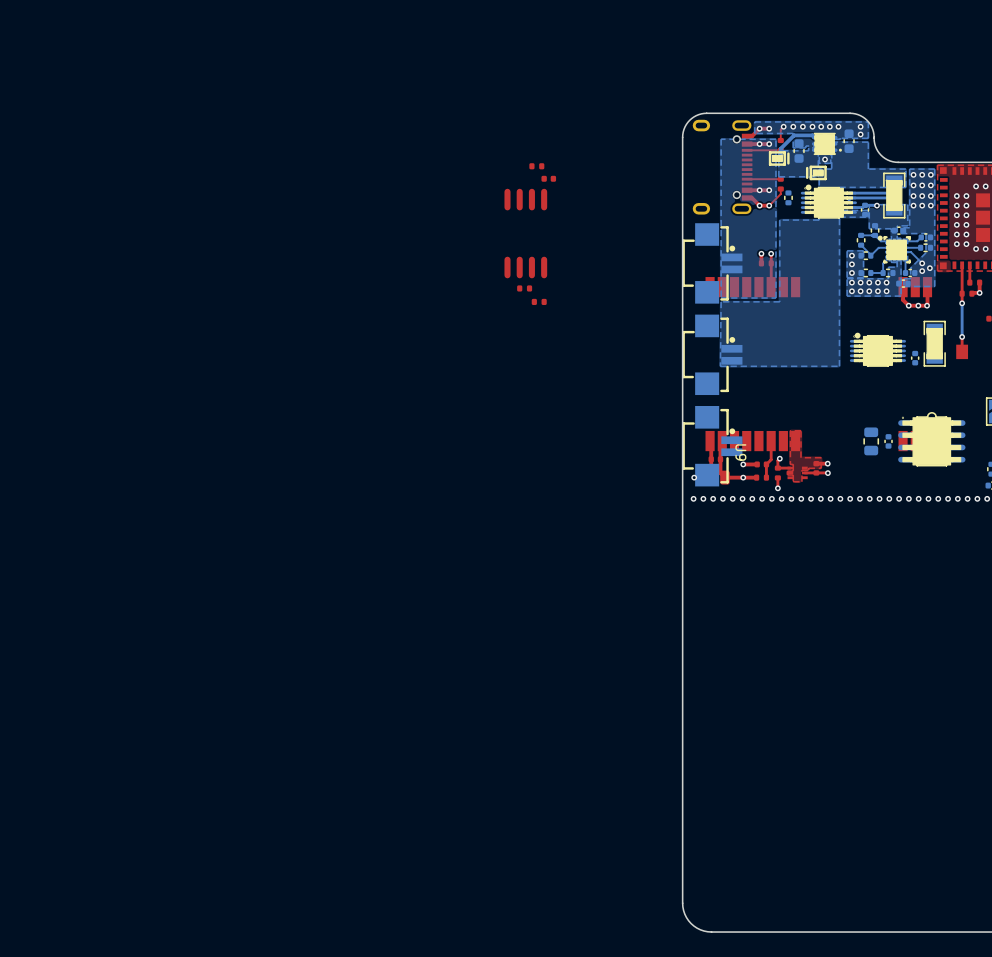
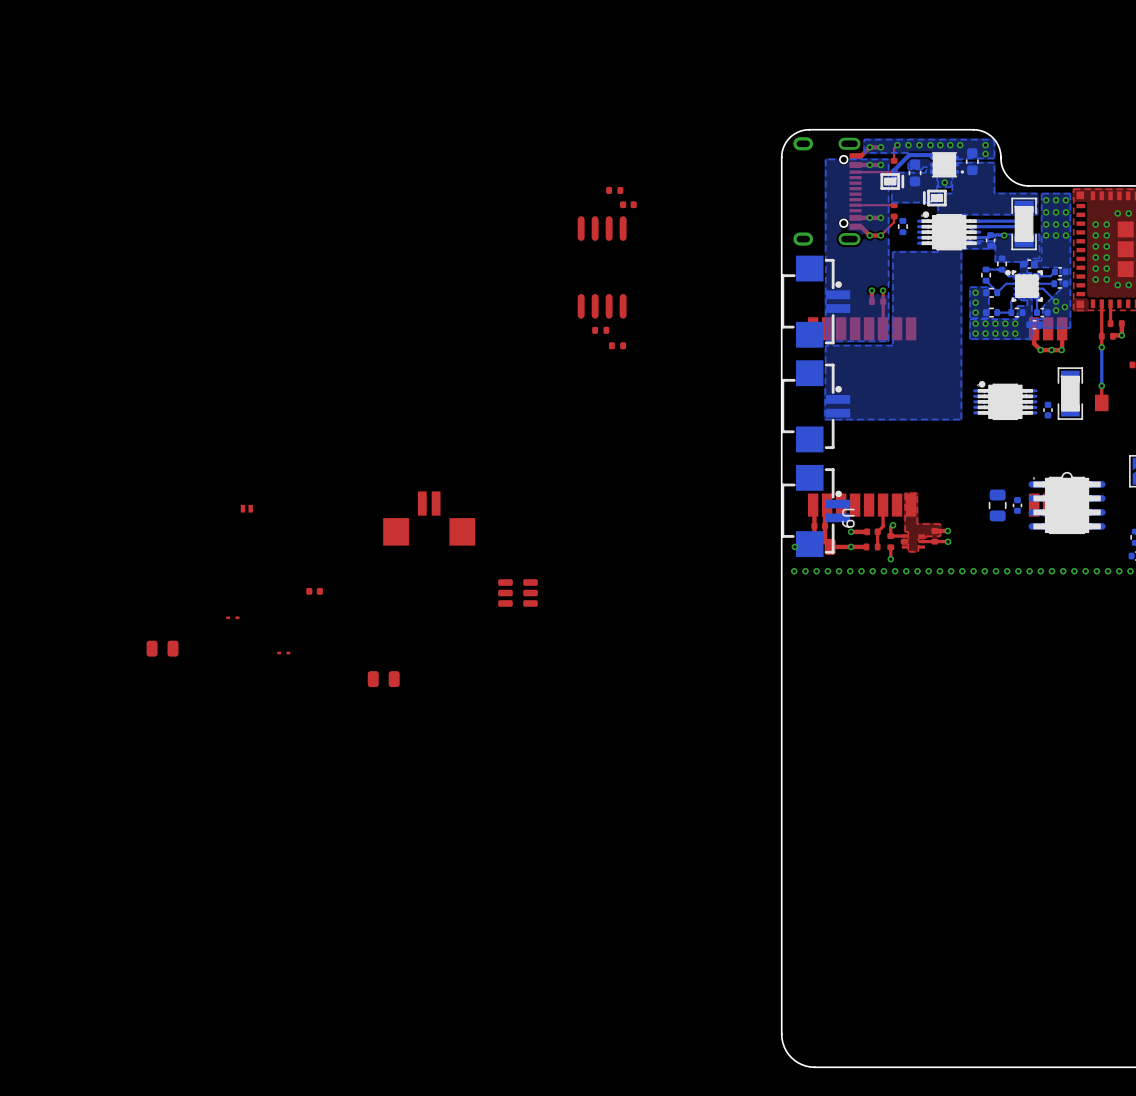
part: none -> (246, 508)
part: none -> (429, 518)
part: none -> (314, 591)
part: none -> (517, 593)
part: none -> (232, 617)
part: none -> (162, 648)
part: none -> (283, 653)
part: none -> (383, 679)

